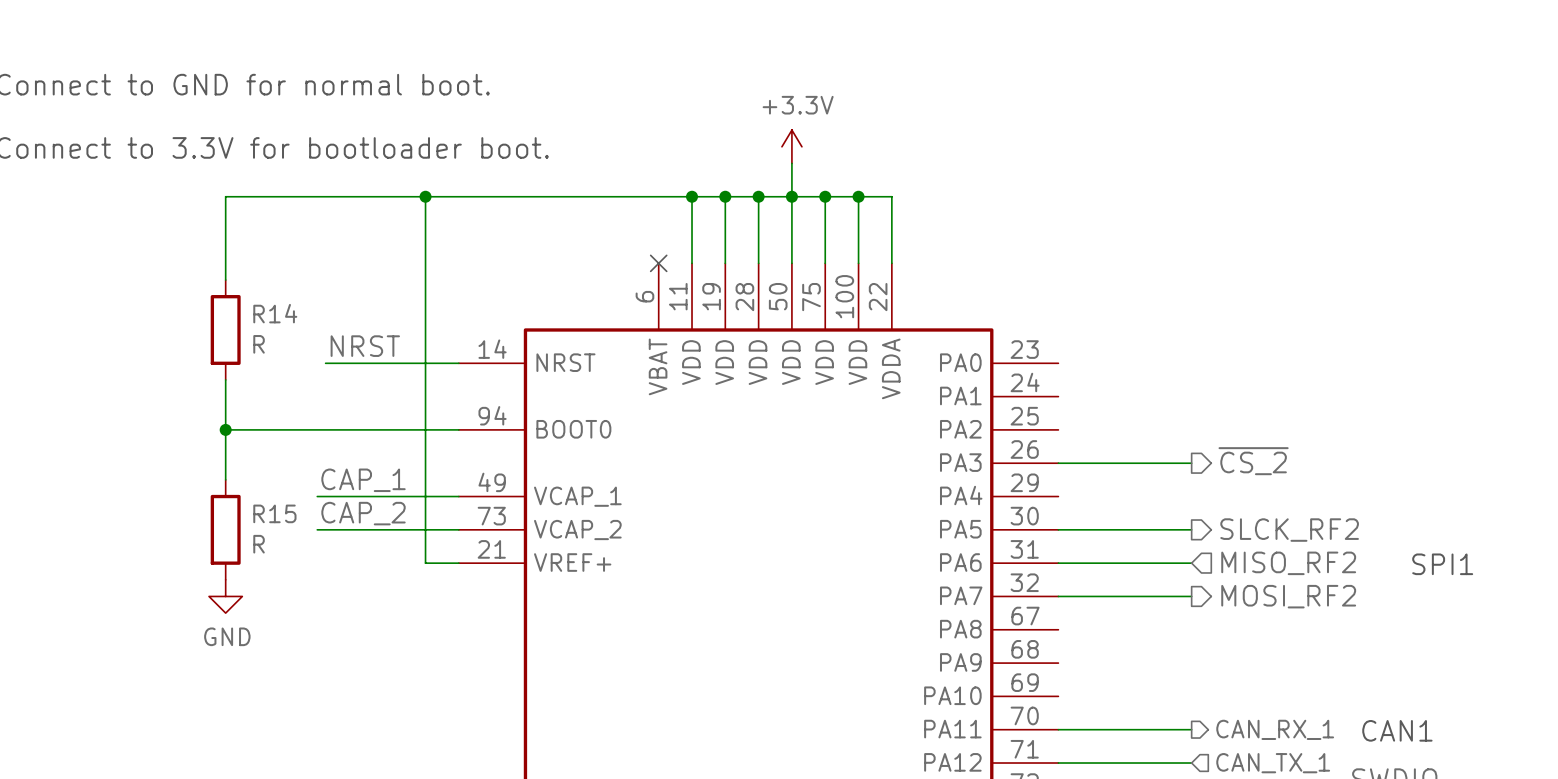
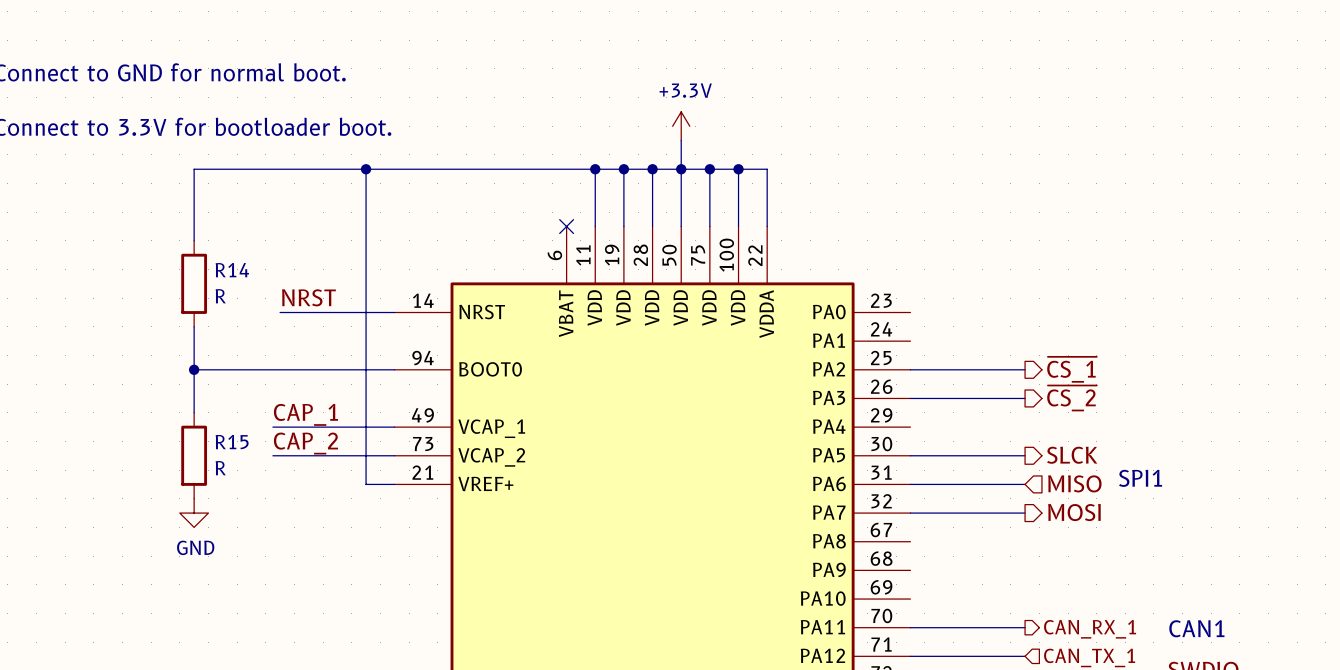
hierarchical label: none -> ~{CS_1} (1071, 369)
wire: none -> (910, 369) (1025, 369)
hierarchical label: SLCK_RF2 (1289, 530) -> SLCK (1072, 455)
hierarchical label: MISO_RF2 (1288, 563) -> MISO (1074, 483)
text position: SPI1 (1442, 564) -> SPI1 (1140, 478)
hierarchical label: MOSI_RF2 (1288, 596) -> MOSI (1074, 512)

